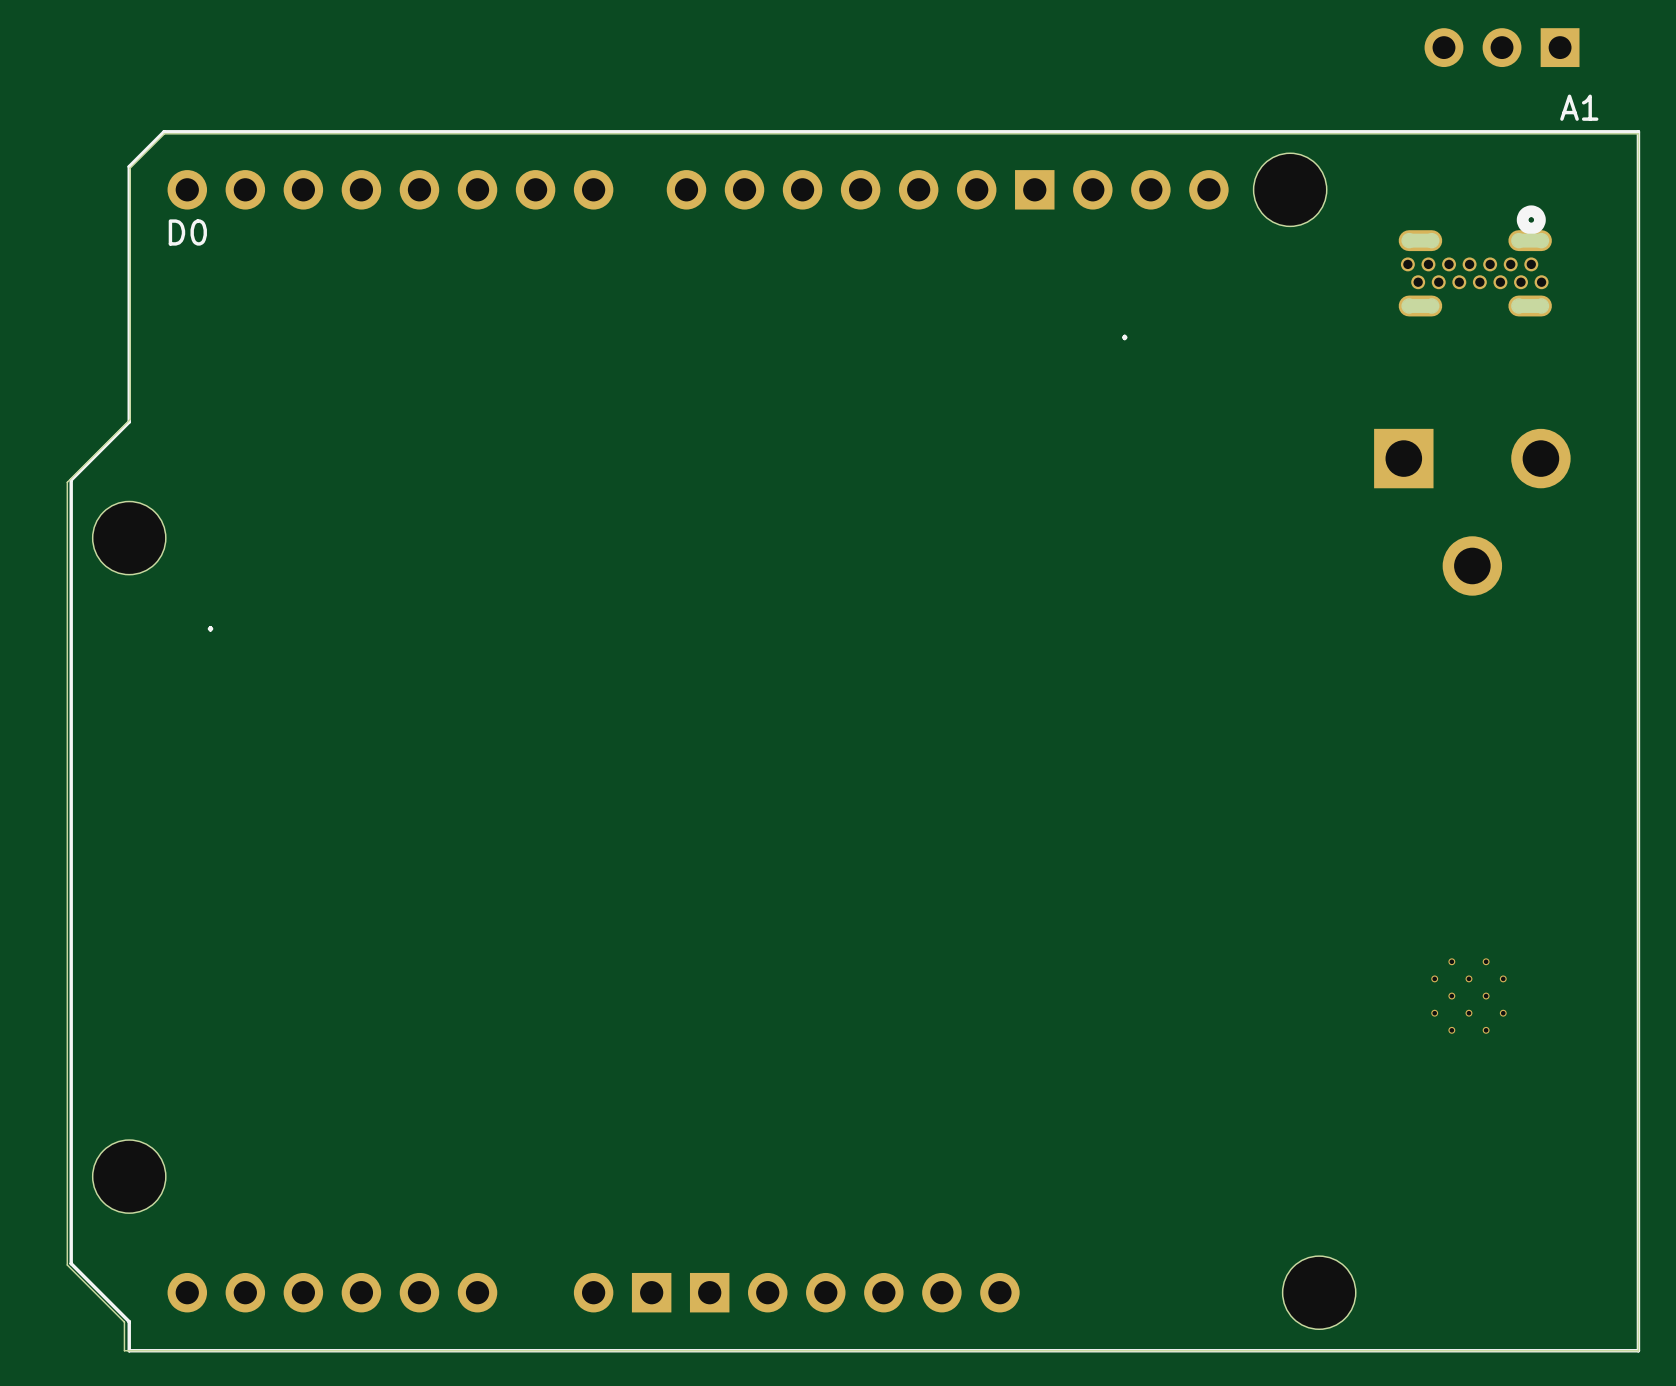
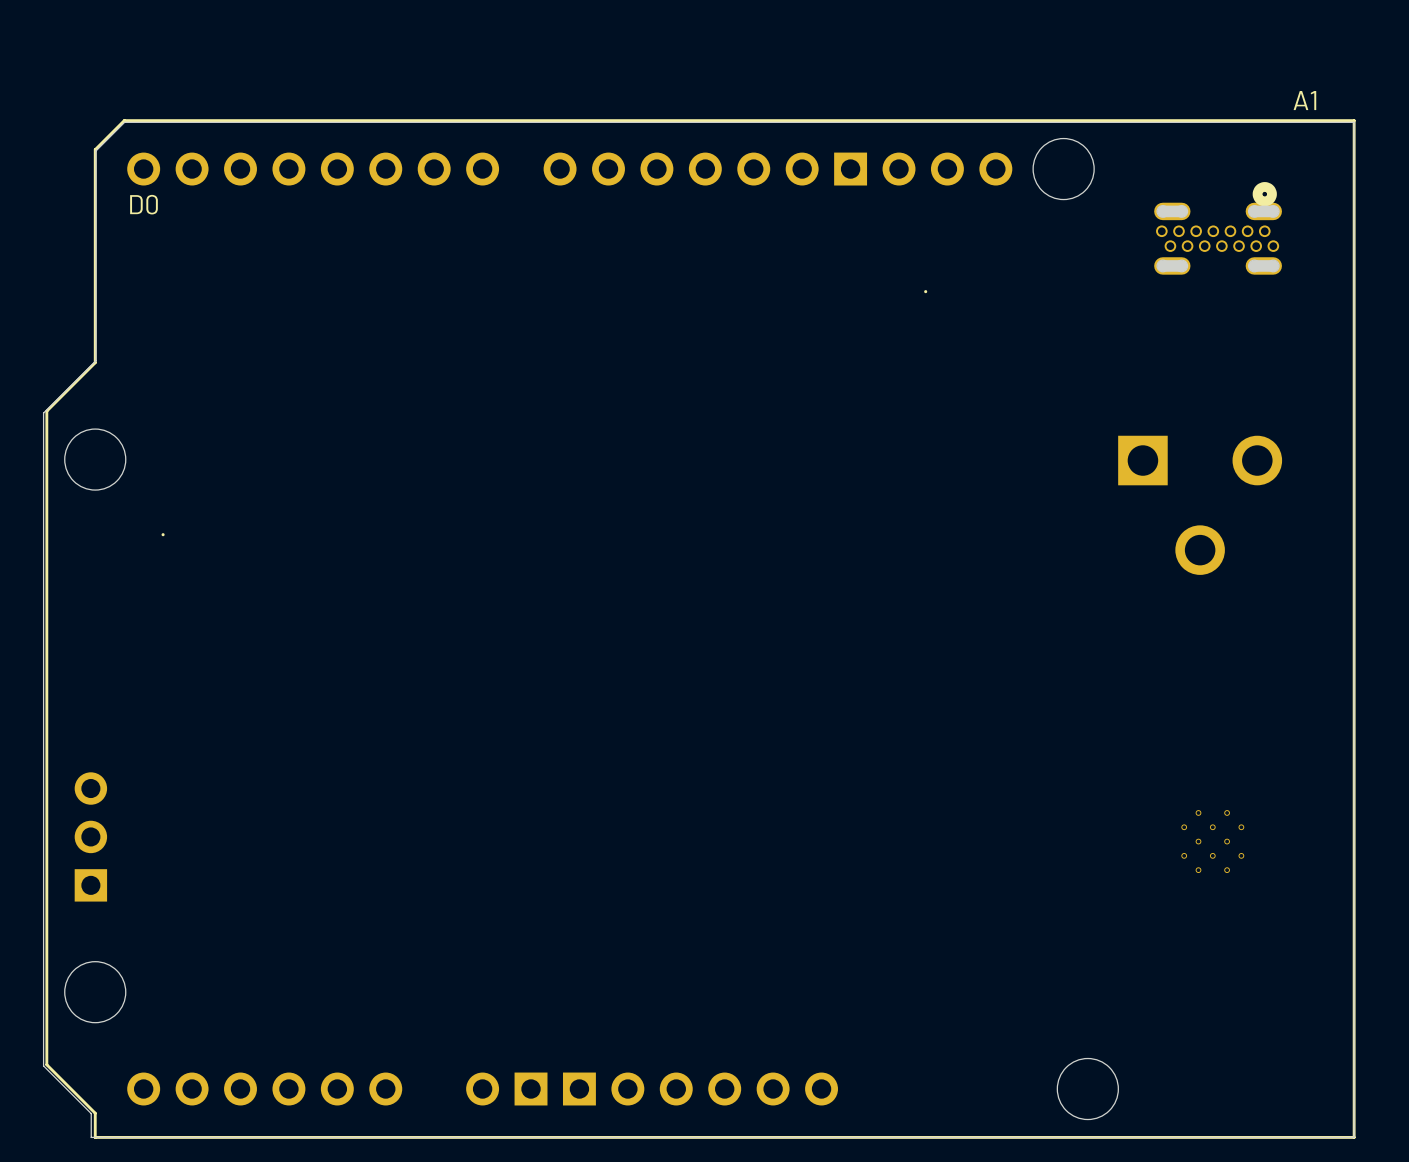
part: (1502, 47) -> none
part position: (1472, 512) -> (1200, 505)
part: none -> (90, 836)

